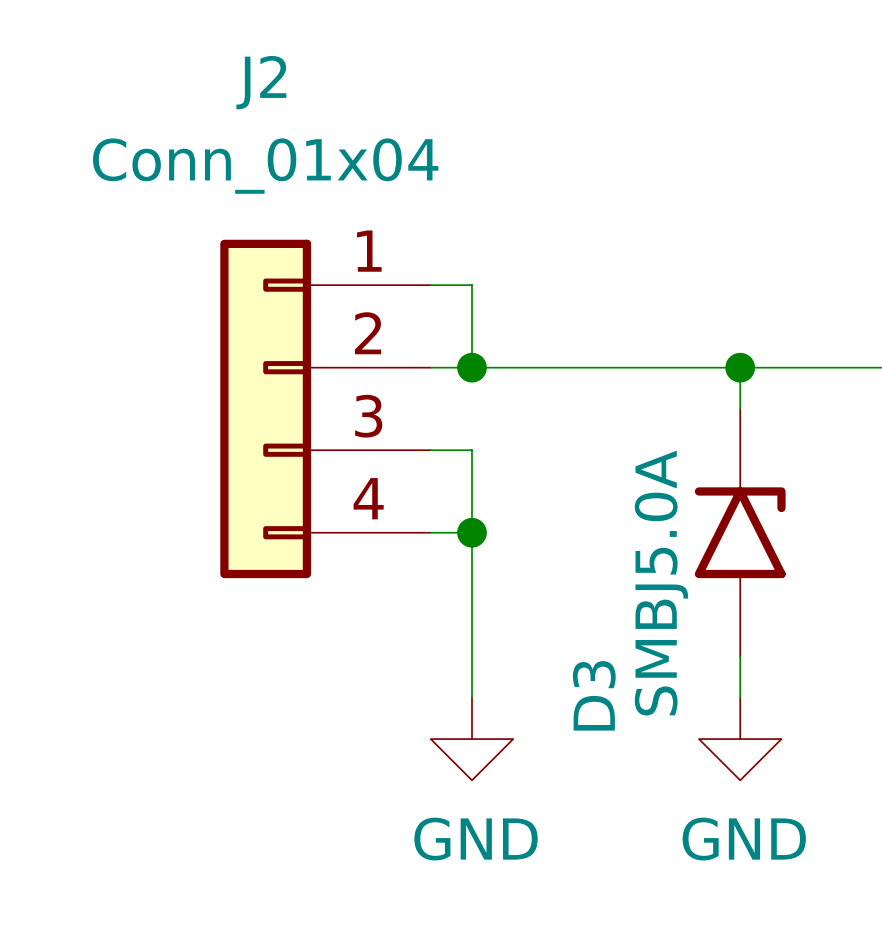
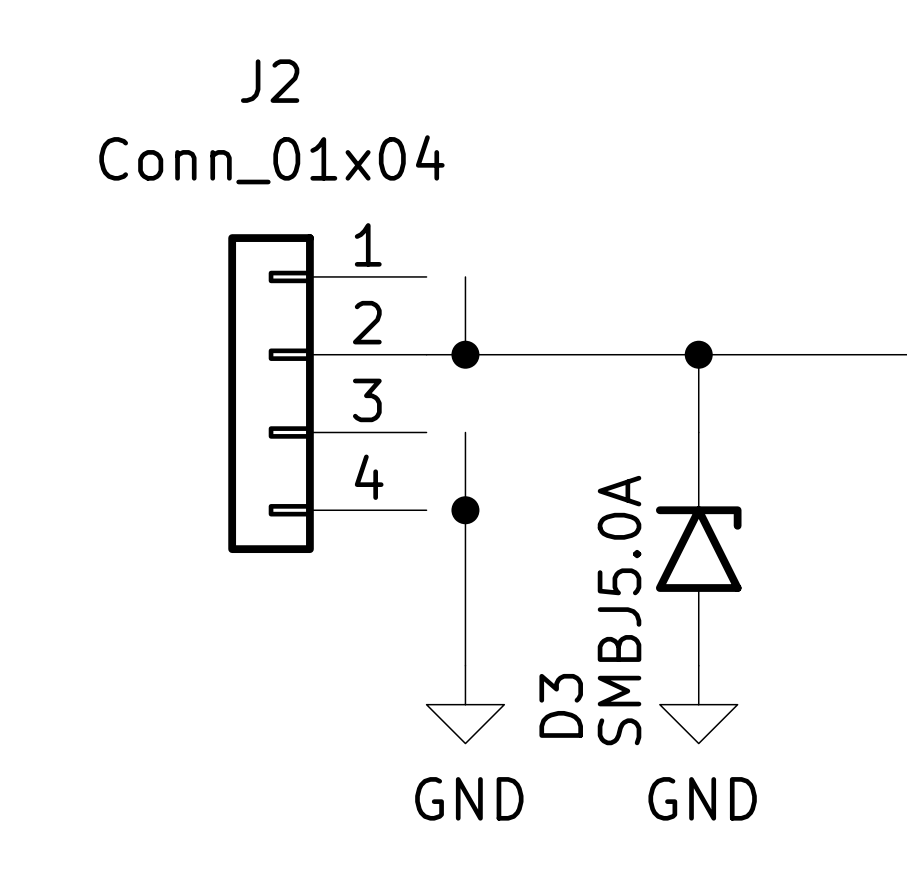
wire: (430, 285) (471, 285) -> none
wire: none -> (698, 354) (698, 432)
wire: (740, 367) (740, 408) -> none
junction position: (740, 367) -> (698, 354)
wire: (430, 450) (471, 450) -> none
wire: (430, 532) (471, 532) -> none
D3 position: (740, 532) -> (698, 549)
wire: (740, 656) (740, 697) -> none
power symbol position: GND (740, 739) -> GND (698, 704)

